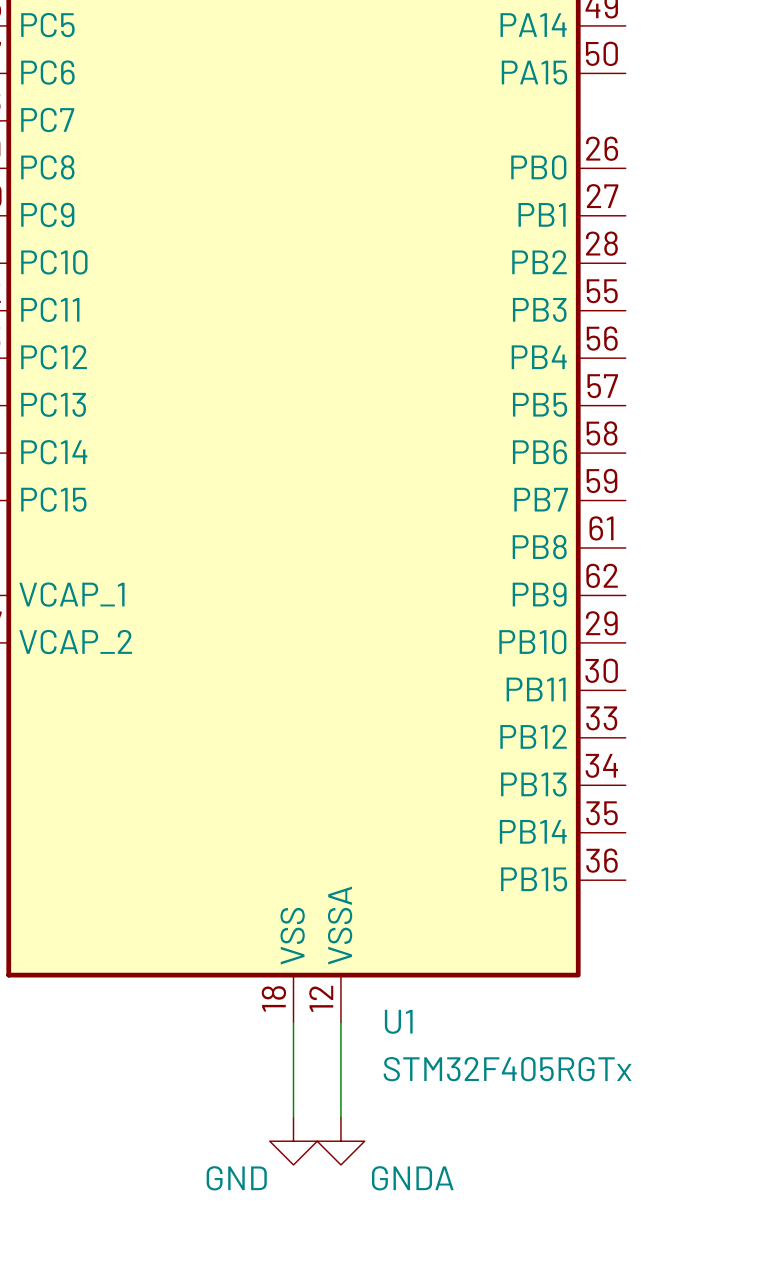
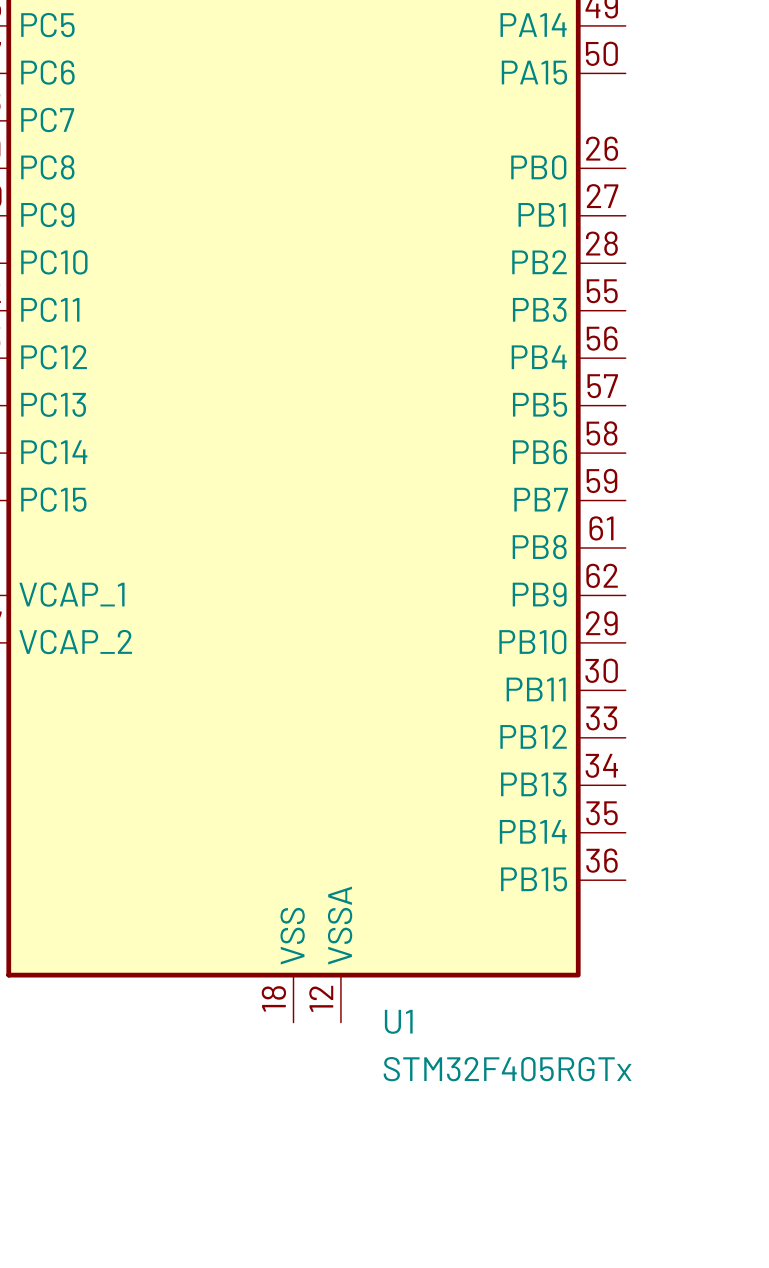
wire: (293, 1022) (293, 1117) -> none
wire: (340, 1022) (340, 1117) -> none
power symbol: GND (293, 1141) -> none
power symbol: GNDA (340, 1141) -> none

